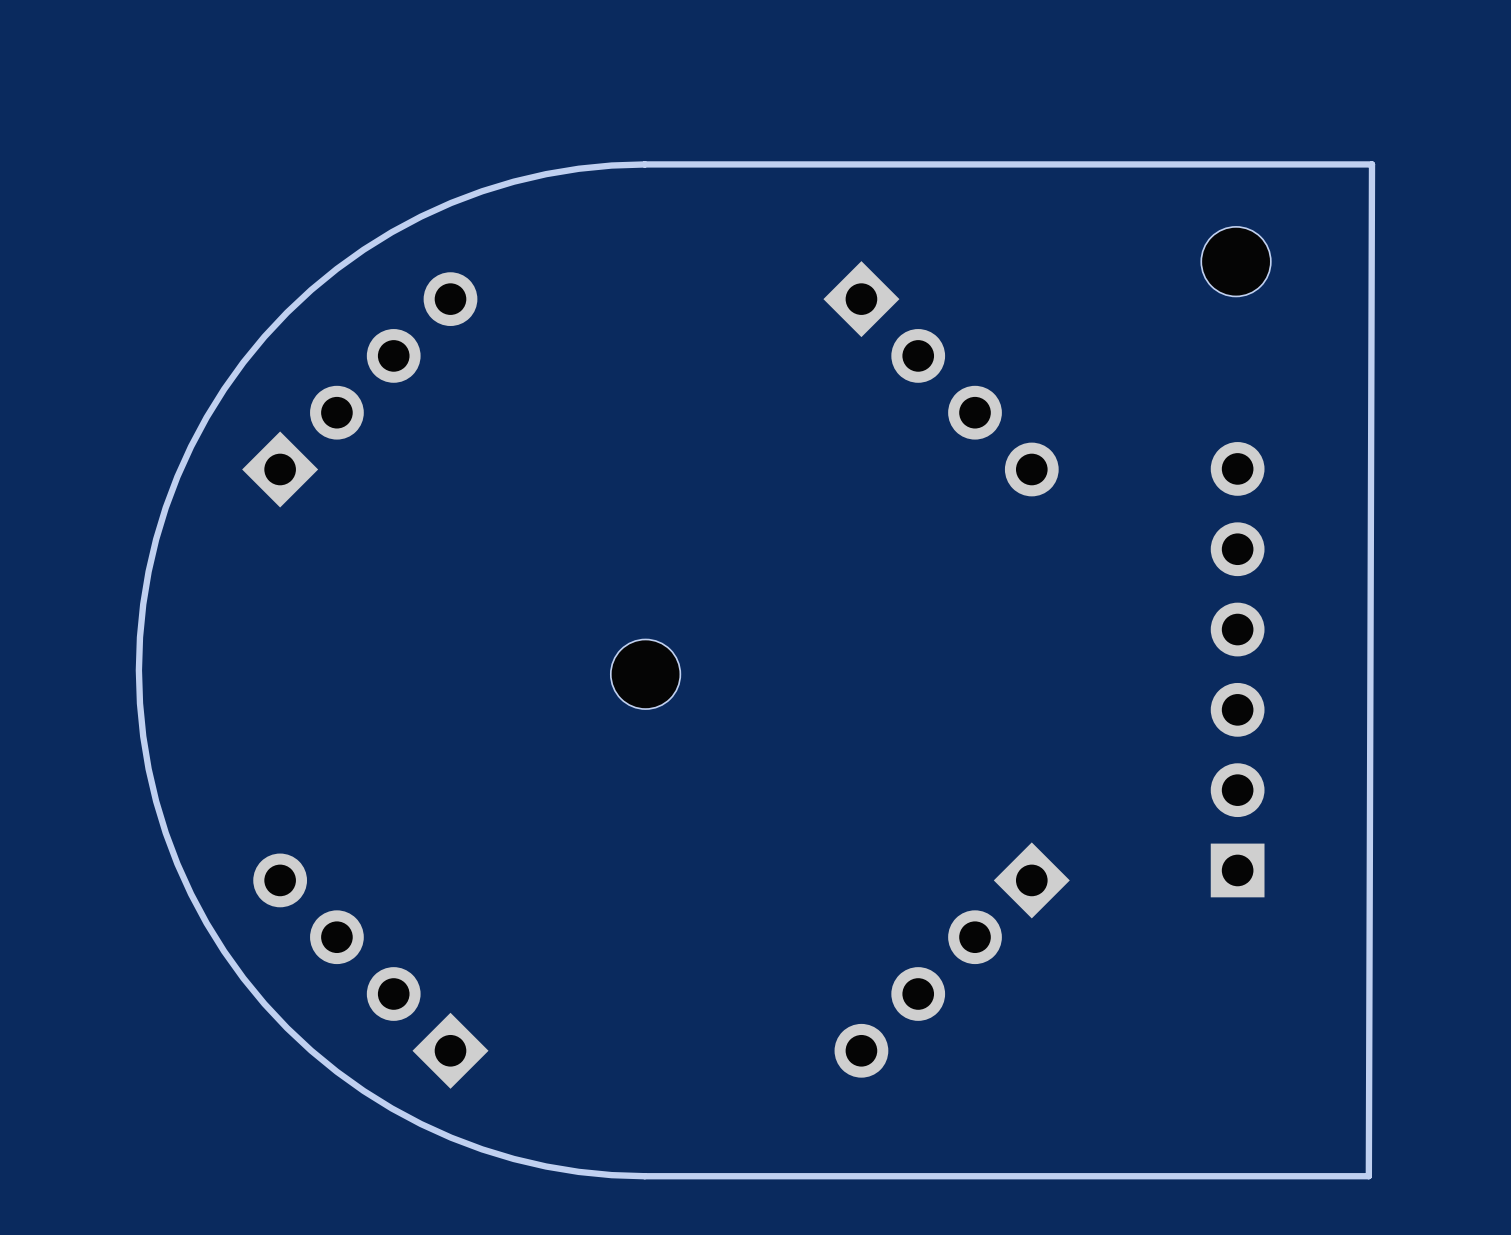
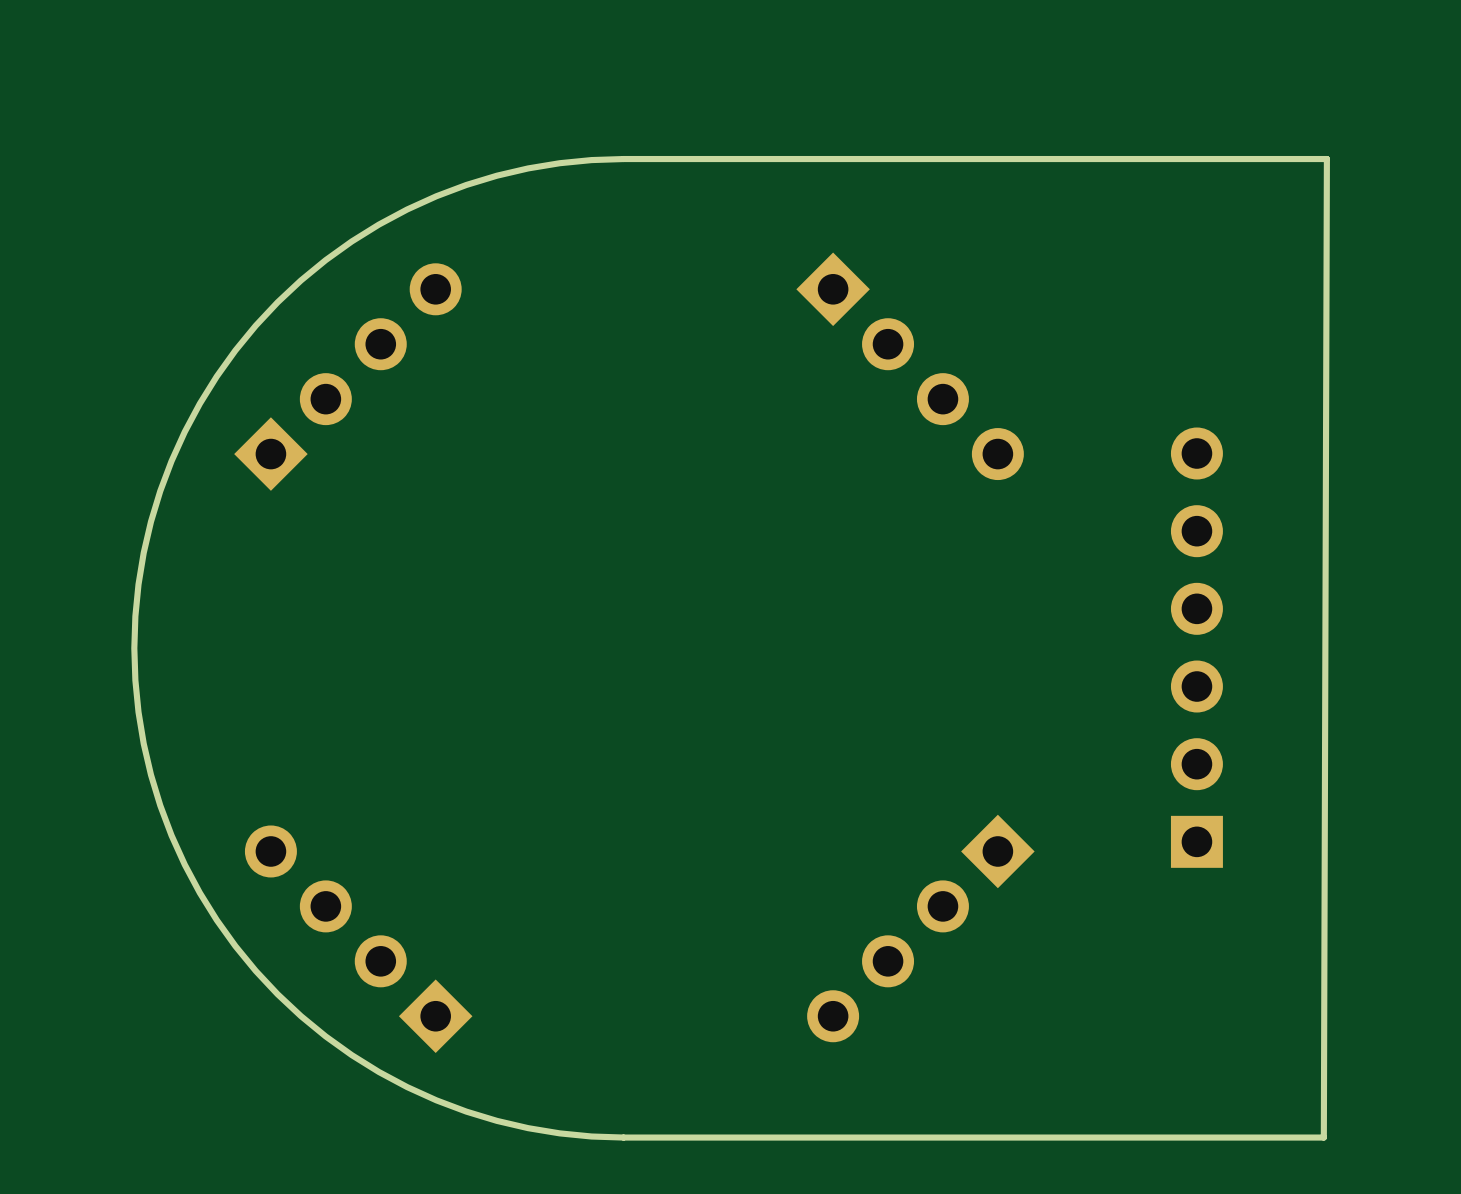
part: (1236, 261) -> none
part: (645, 674) -> none

